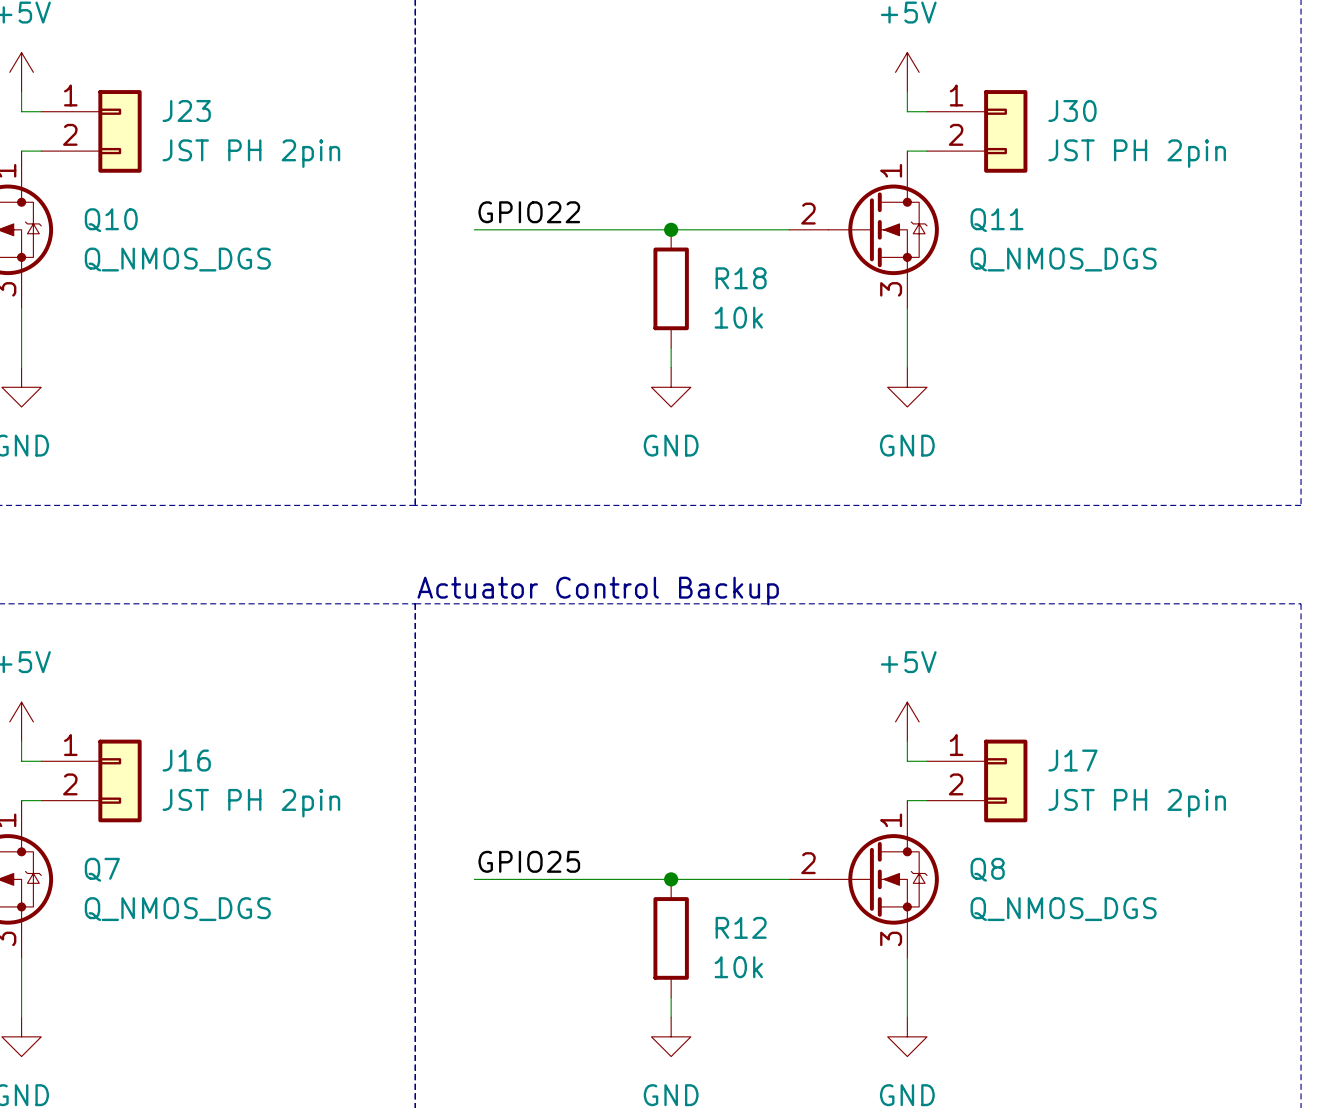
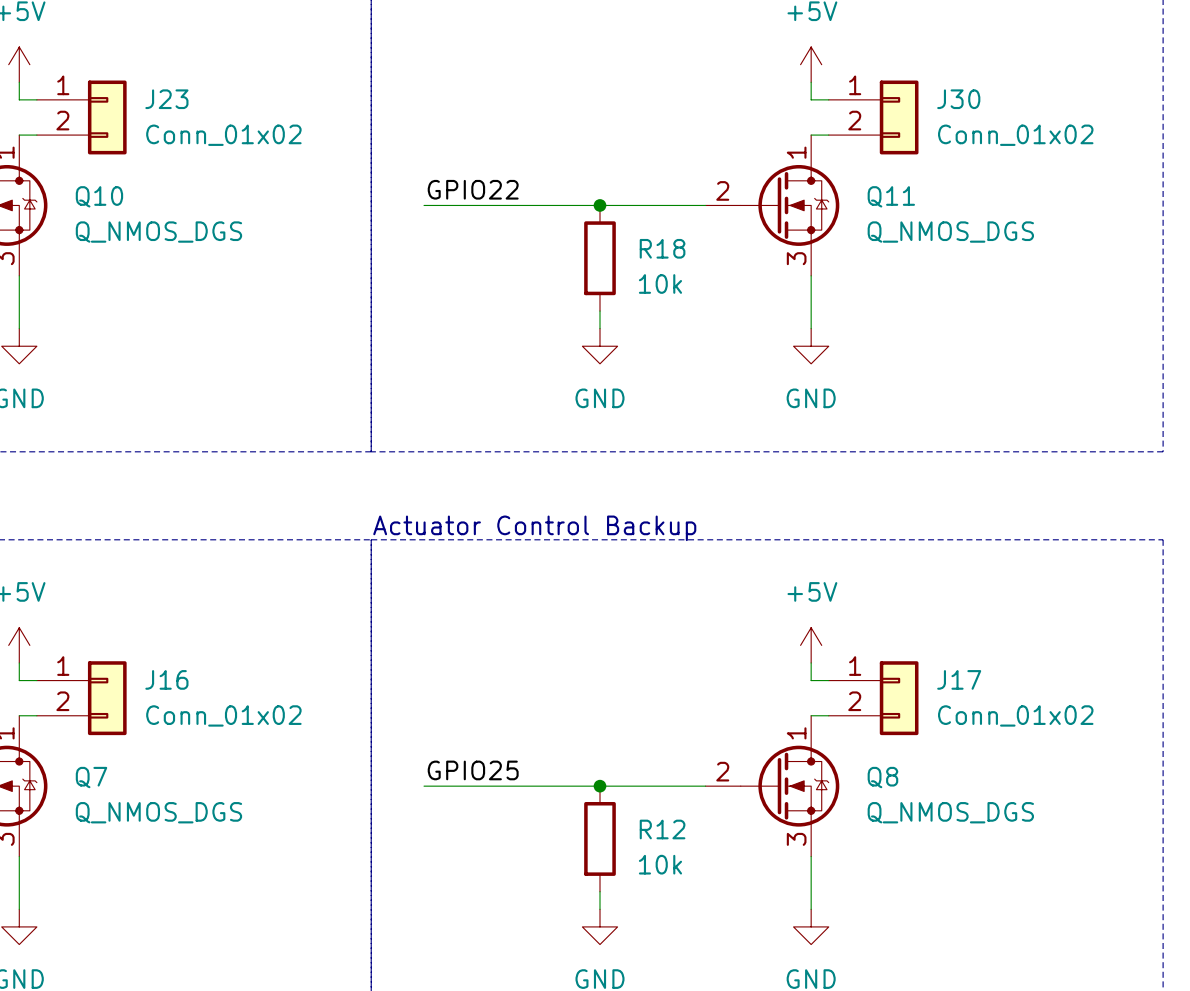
J23 value: JST PH 2pin (251, 153) -> Conn_01x02 (223, 135)
J30 value: JST PH 2pin (1137, 153) -> Conn_01x02 (1015, 135)
J16 value: JST PH 2pin (251, 803) -> Conn_01x02 (223, 715)
J17 value: JST PH 2pin (1137, 803) -> Conn_01x02 (1015, 715)

